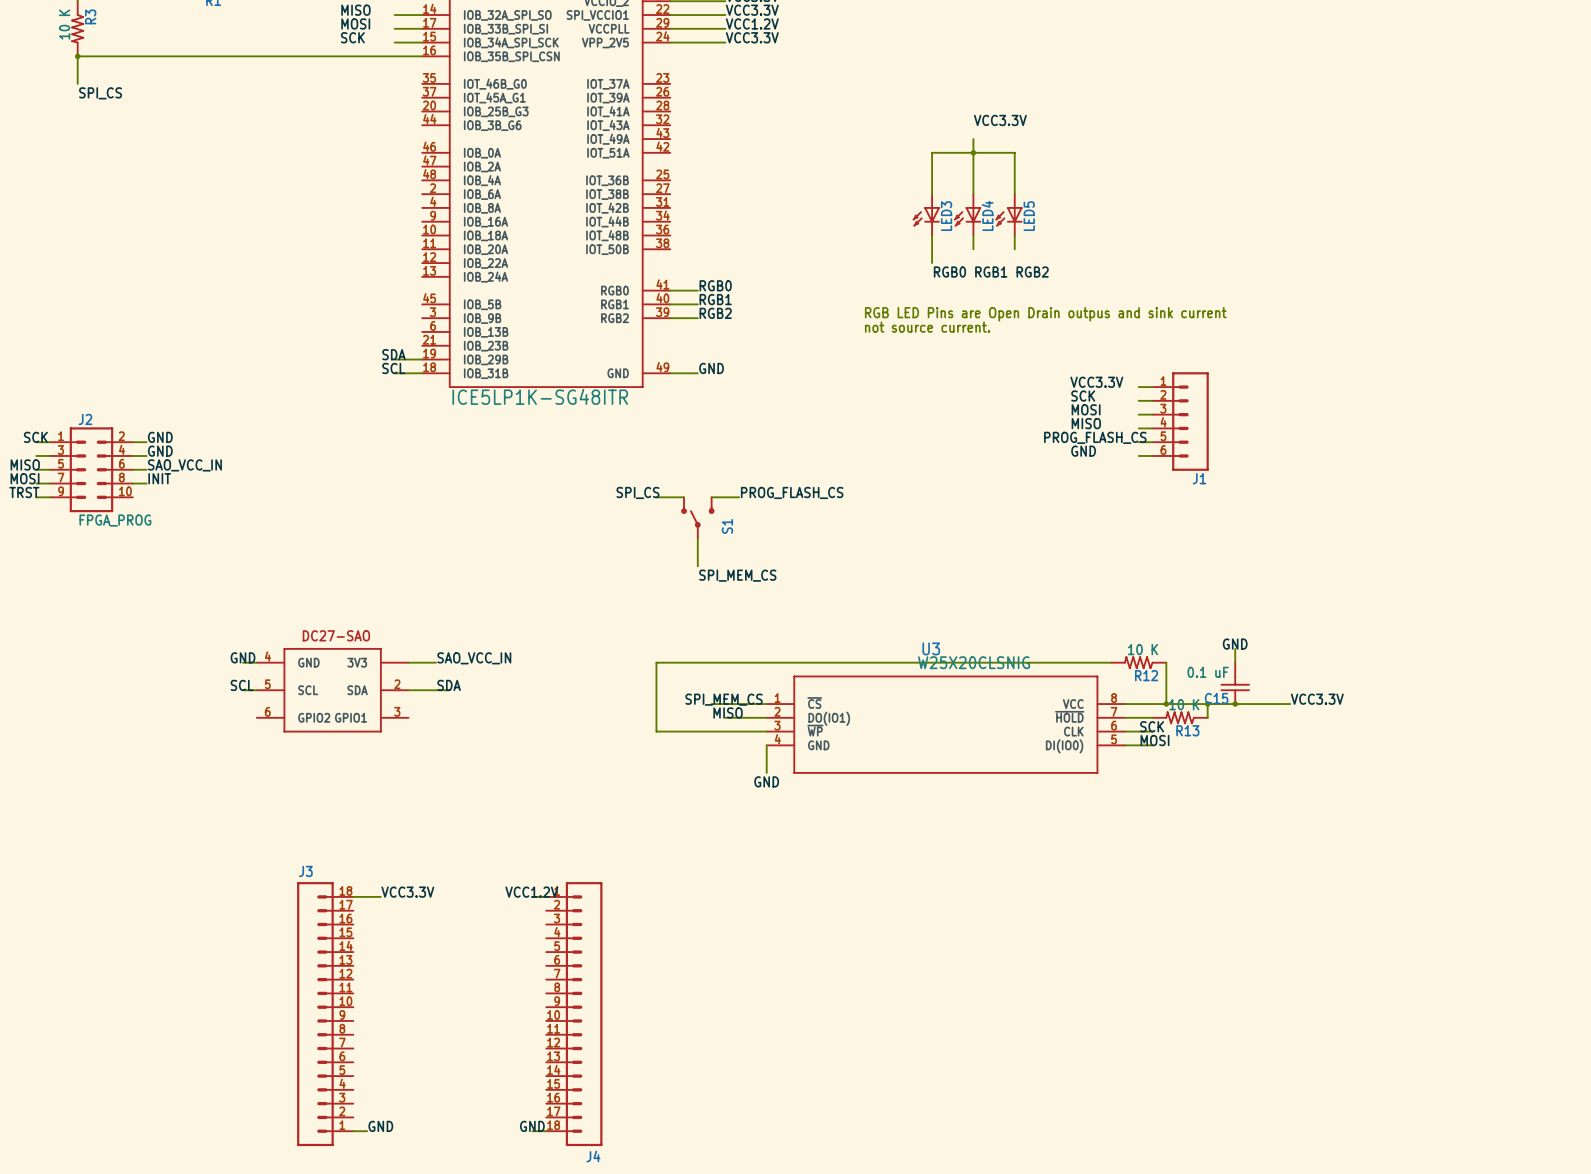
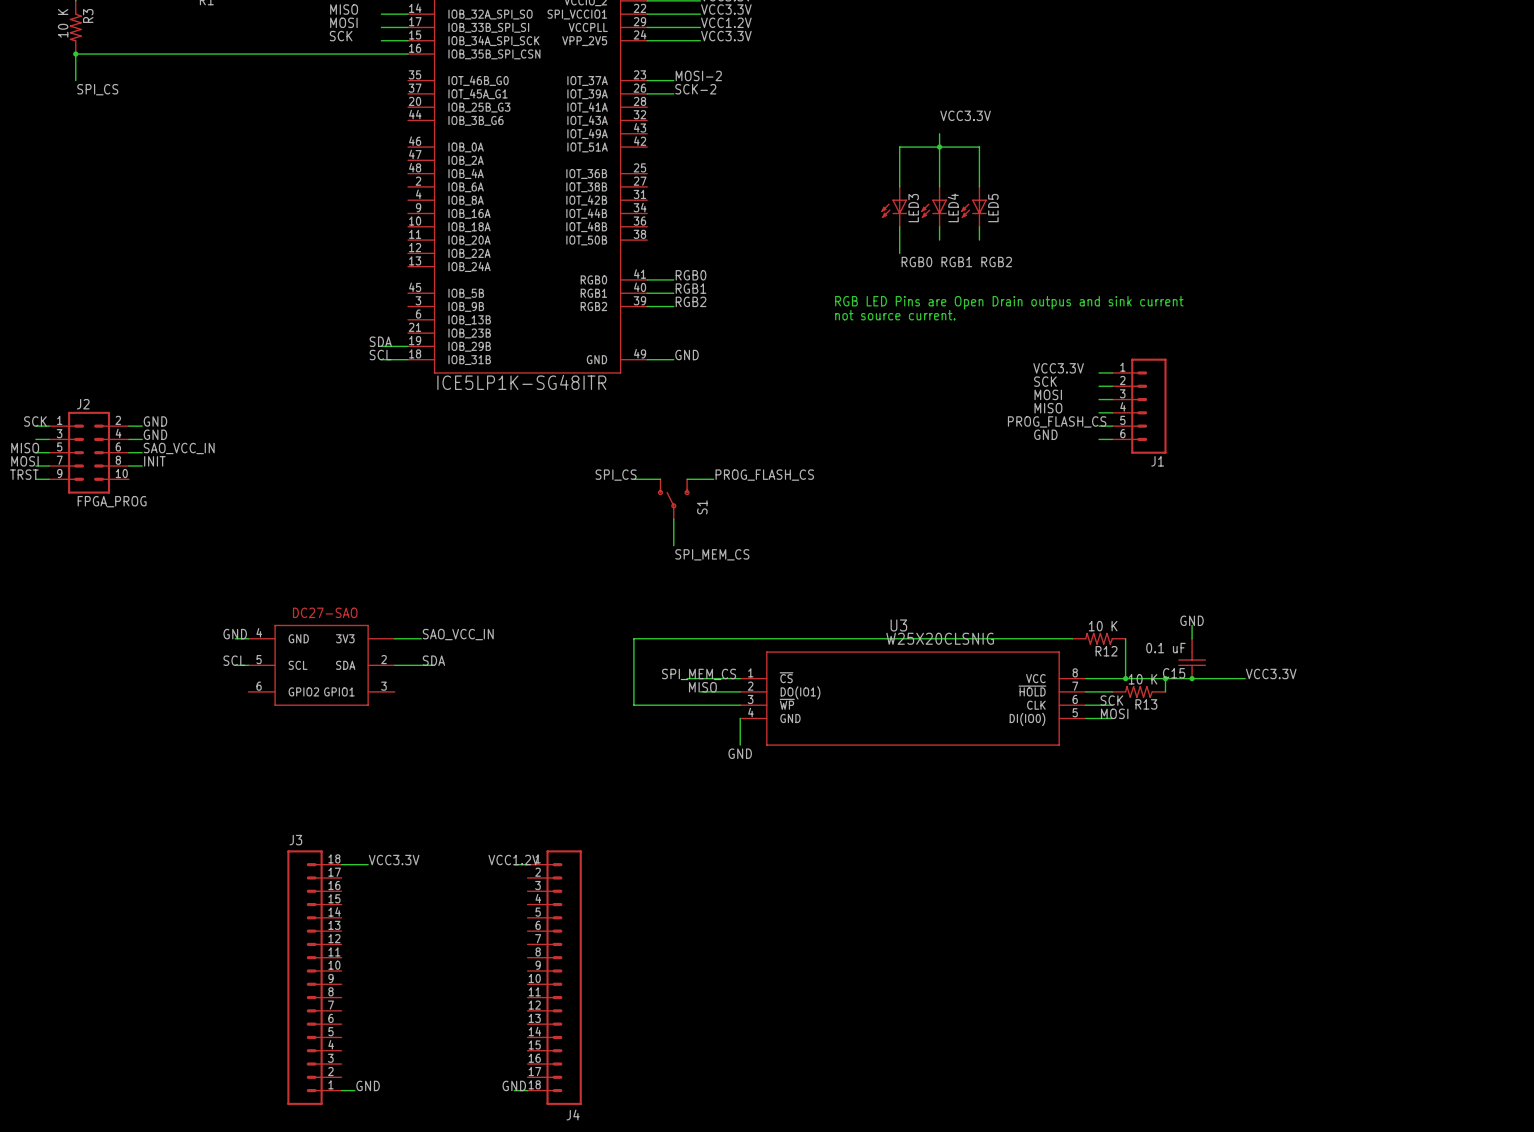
label: none -> MOSI-2 (698, 75)
wire: none -> (647, 80) (673, 80)
label: none -> SCK-2 (695, 89)
wire: none -> (647, 93) (673, 93)

